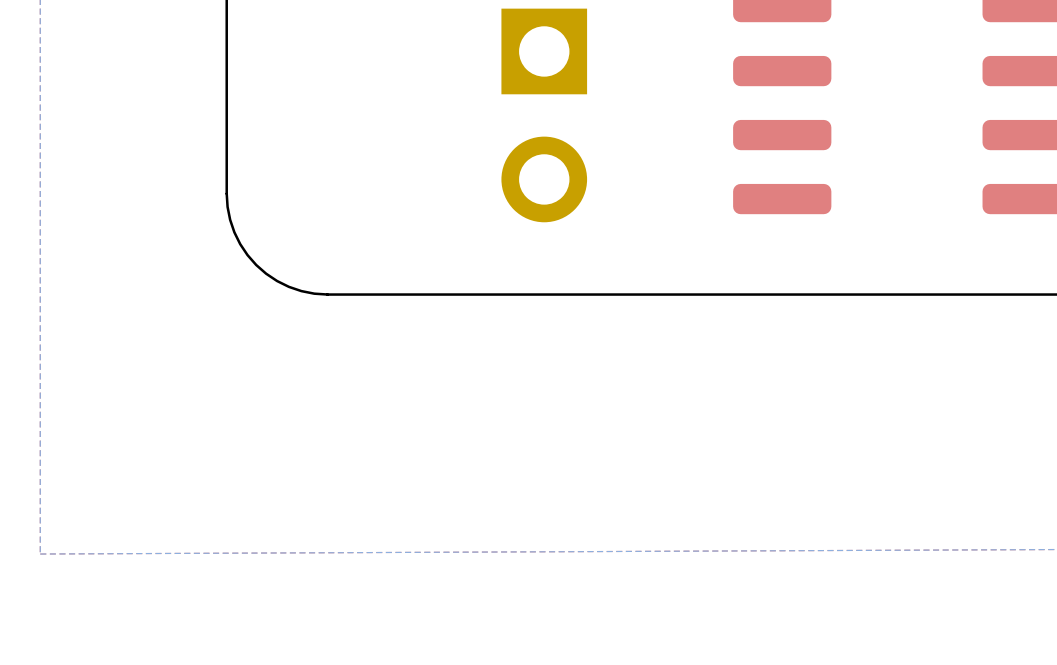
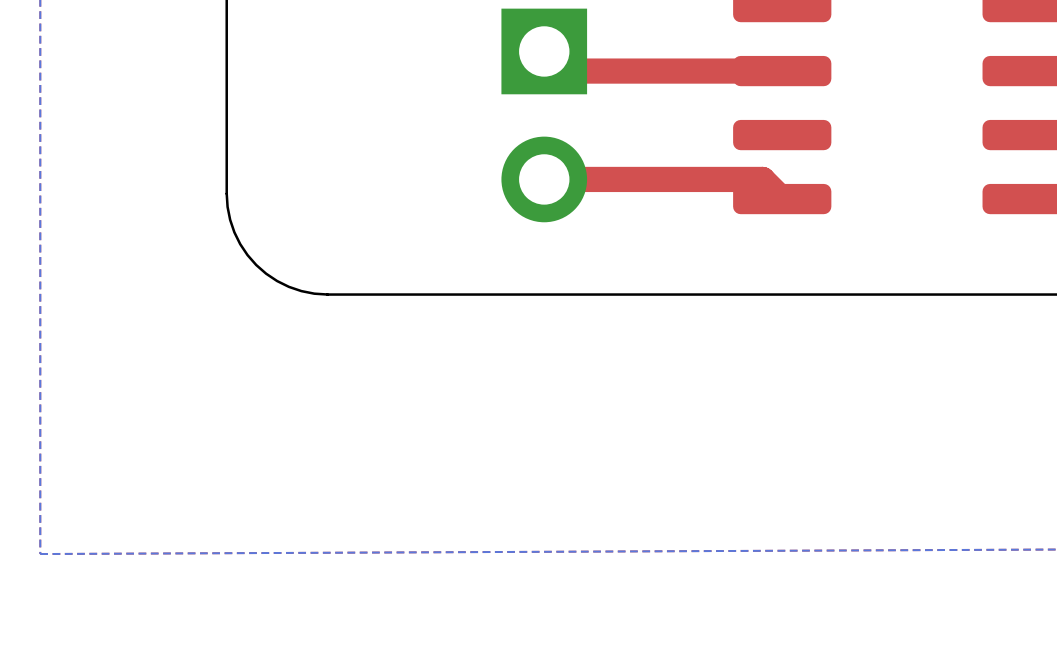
top track: none -> (544, 51) (563, 71) (782, 71)
top track: none -> (544, 179) (762, 179) (782, 199)

